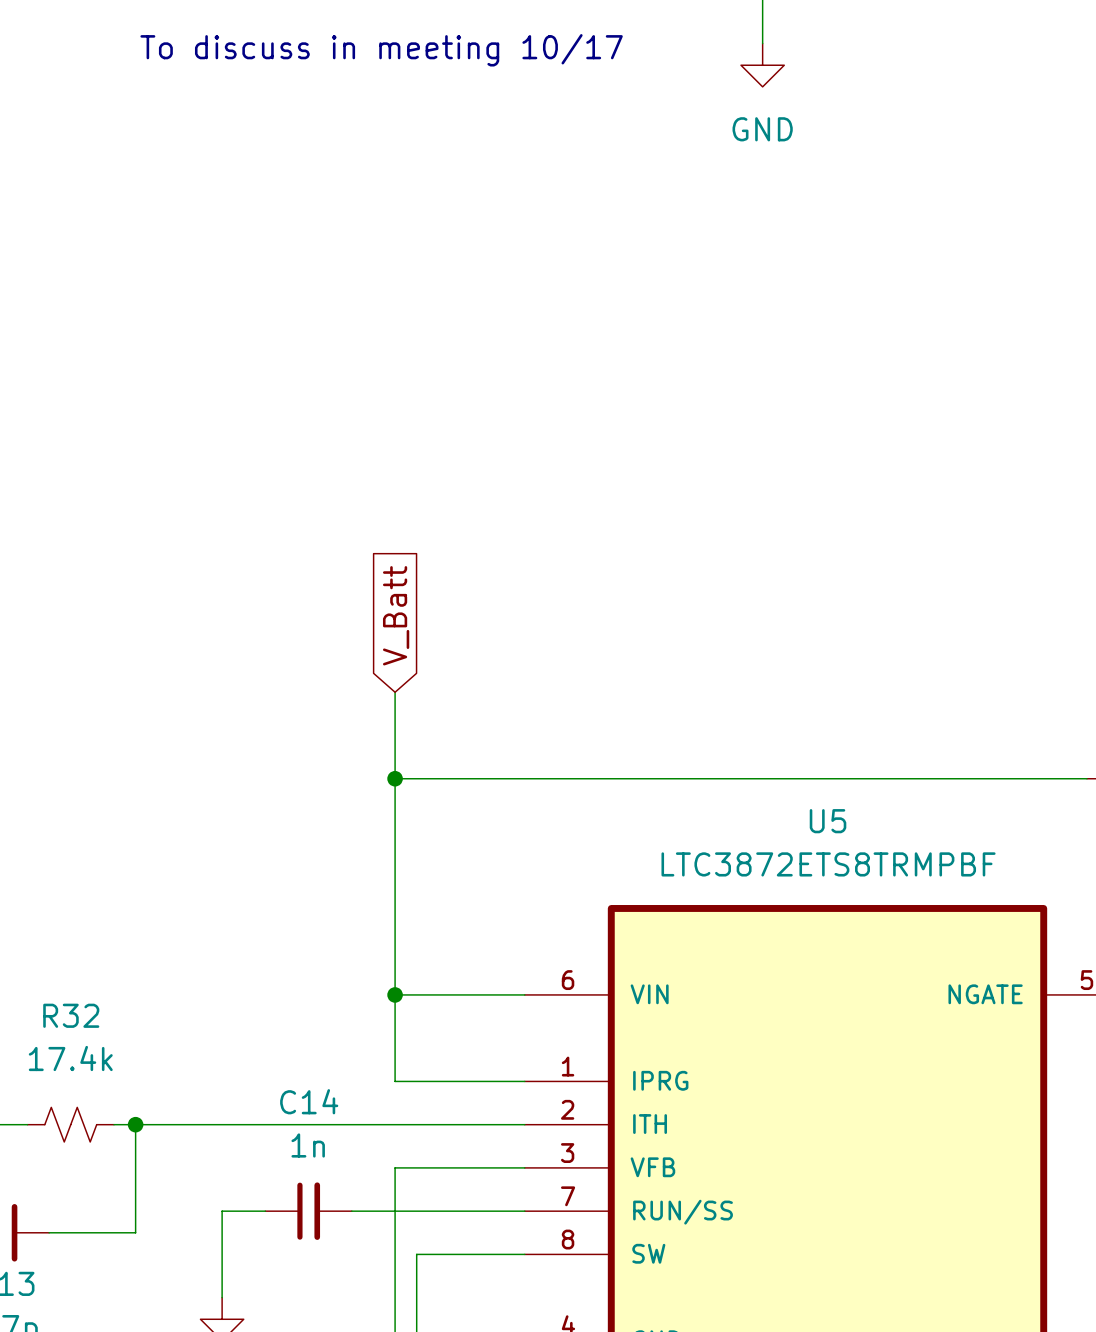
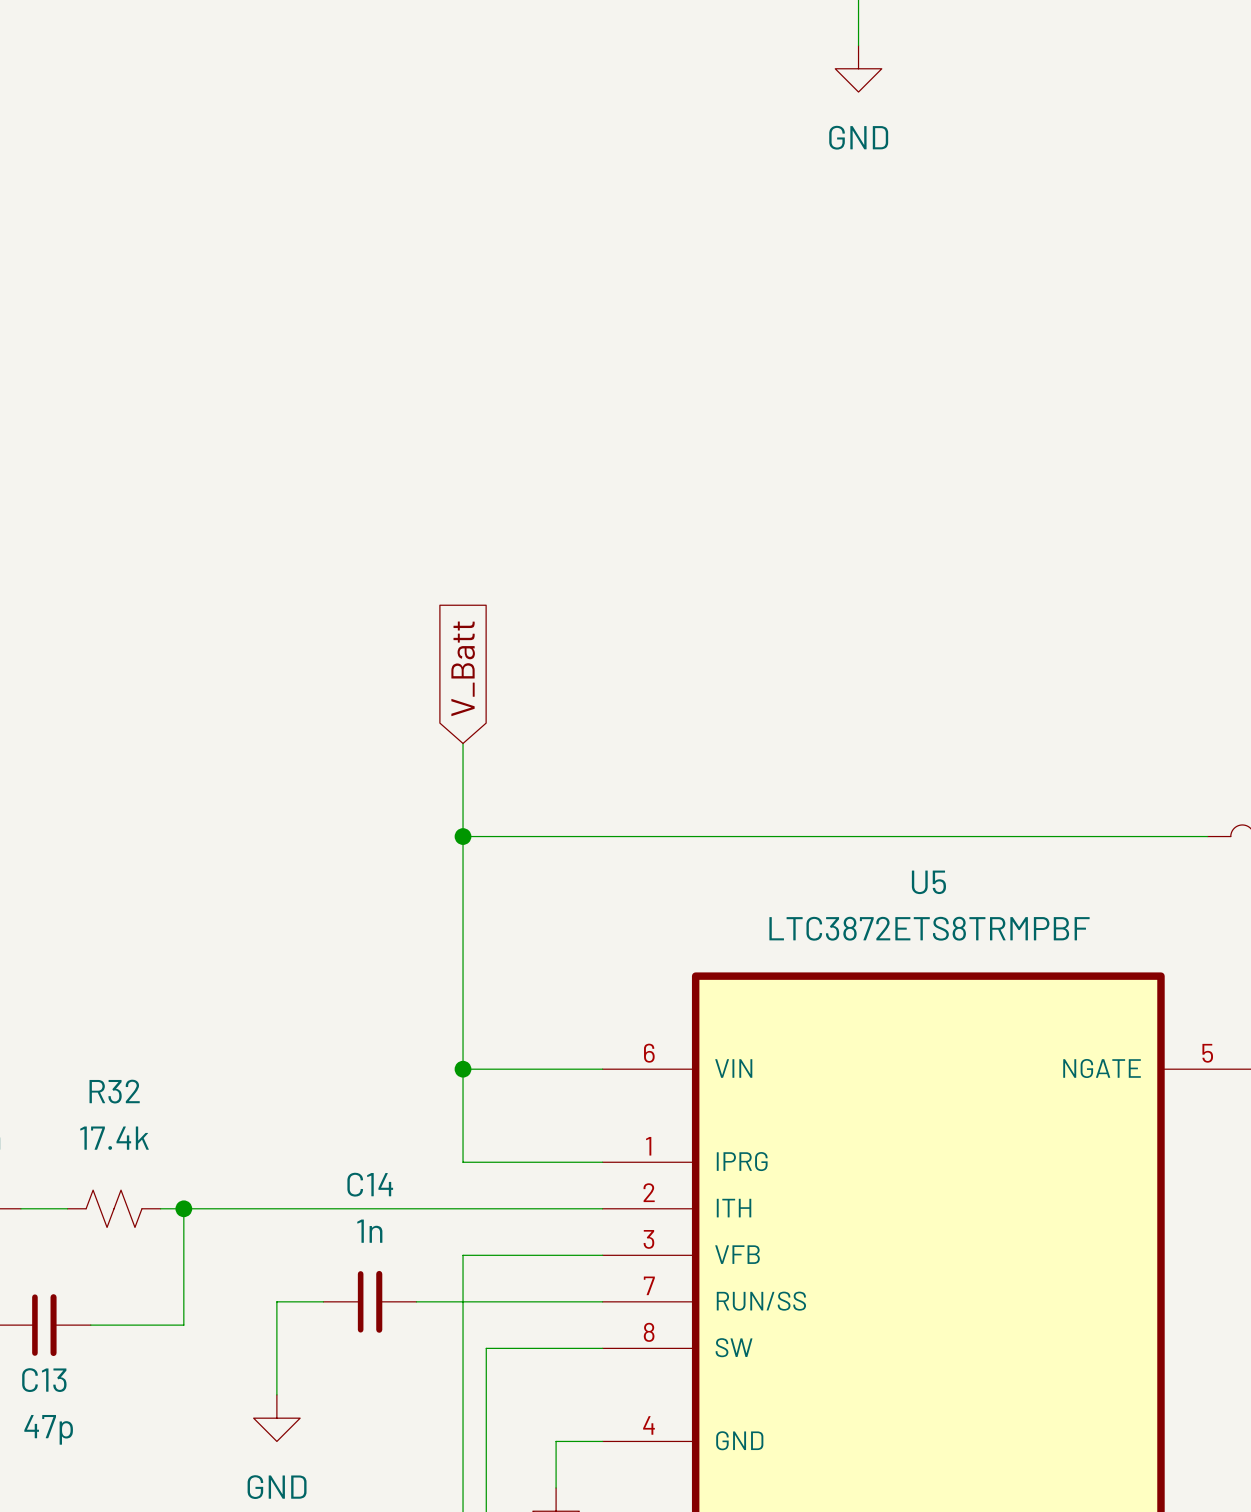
text: To discuss in meeting 10/17 (381, 50) -> none

